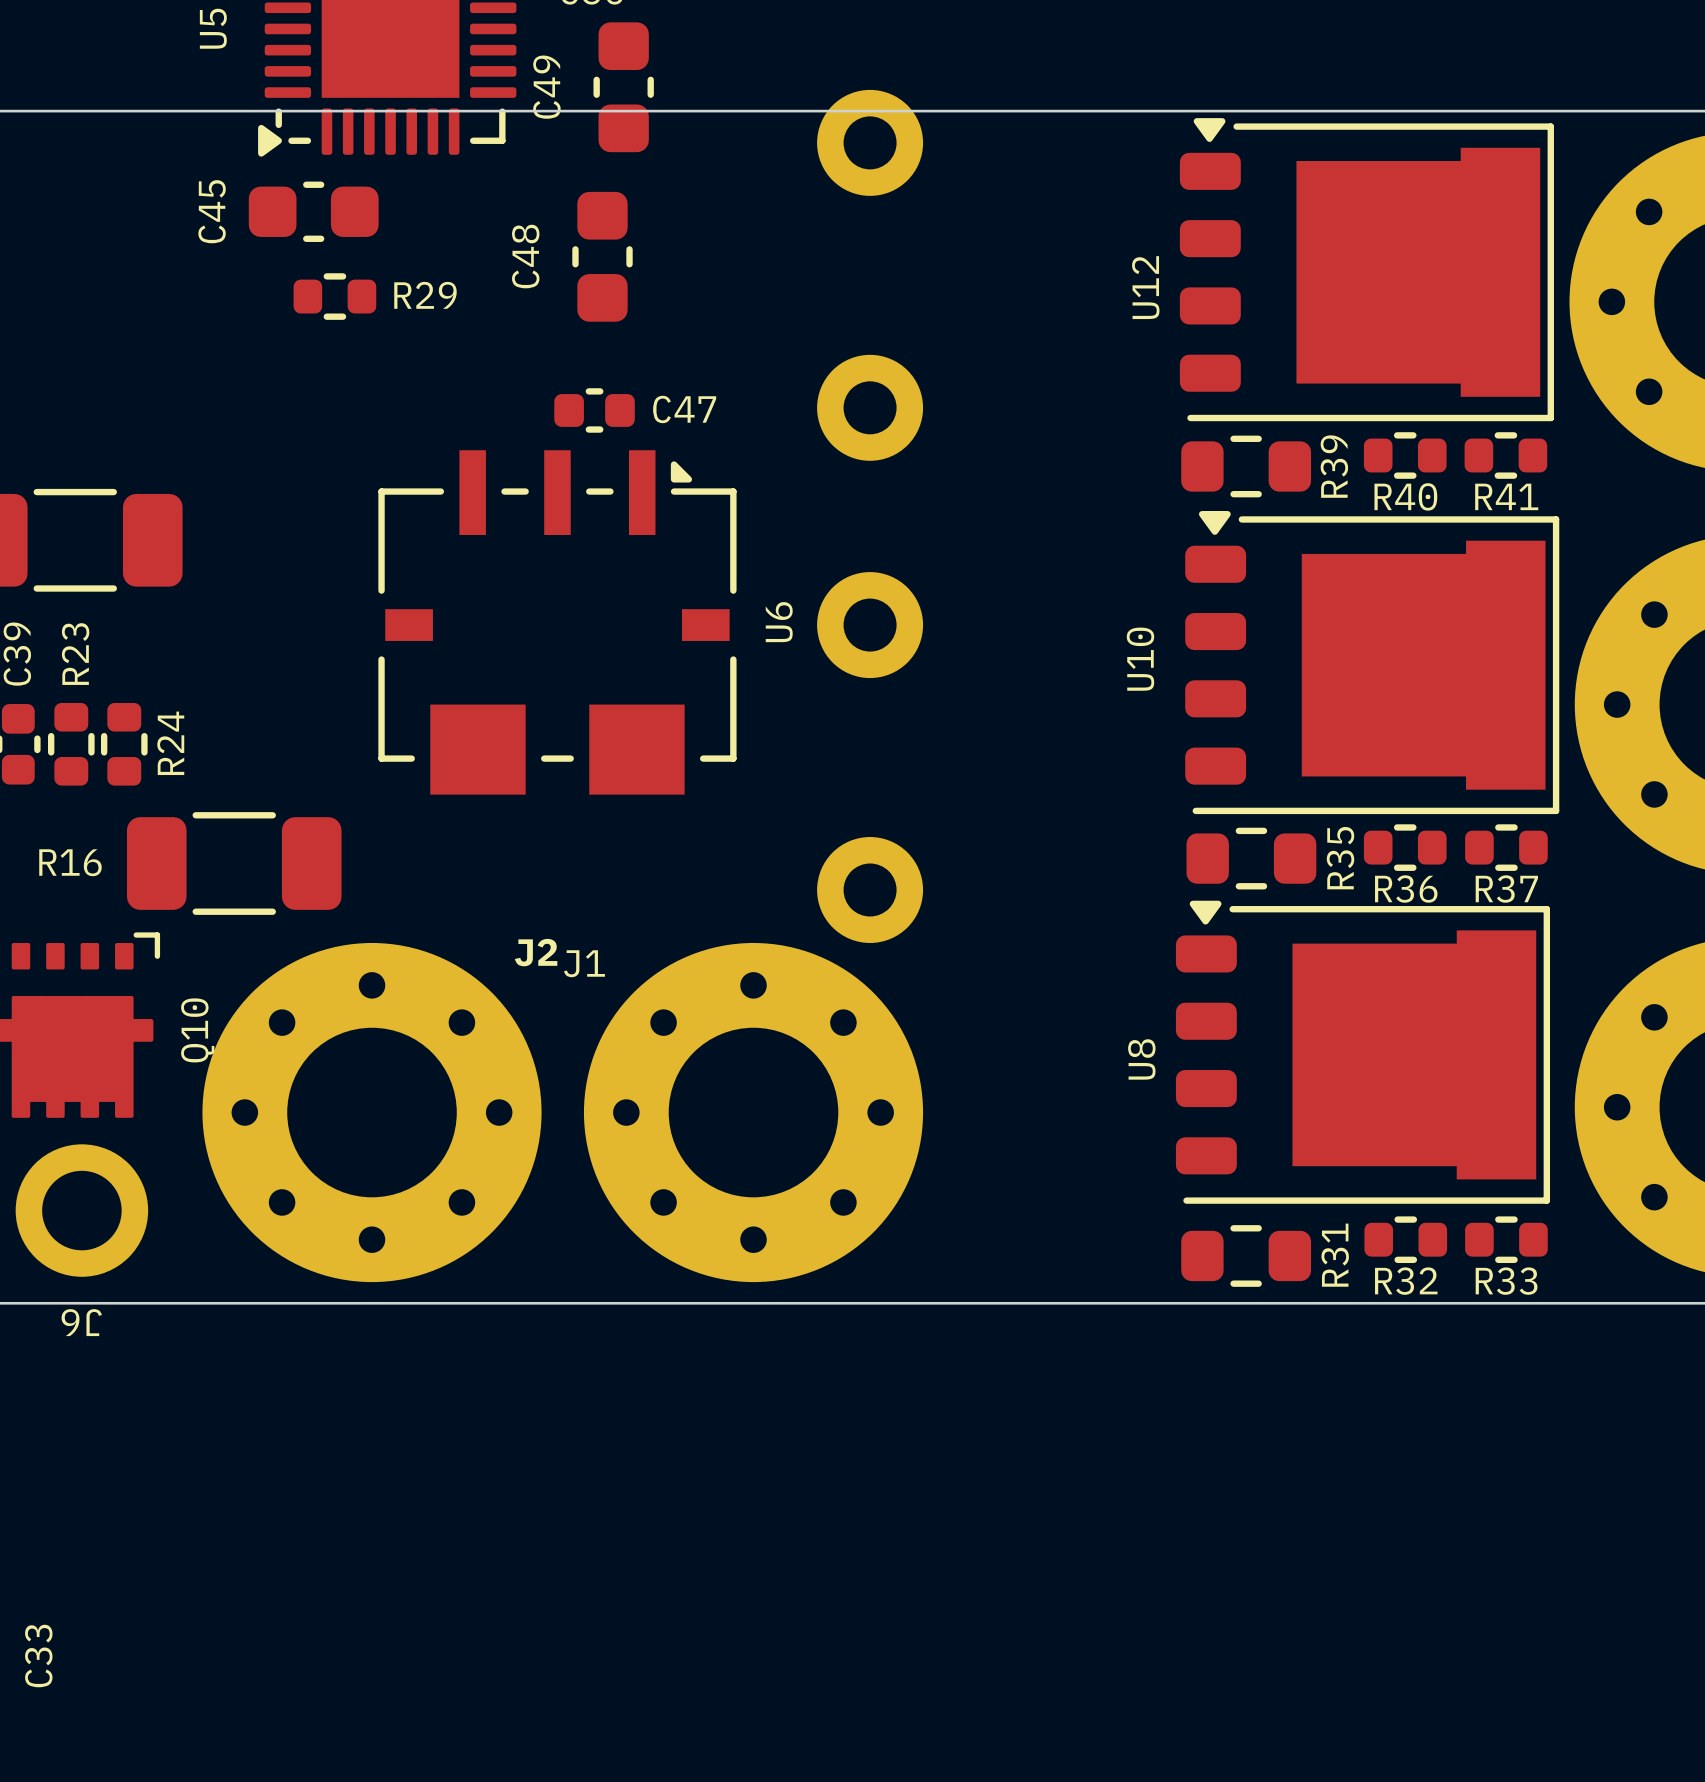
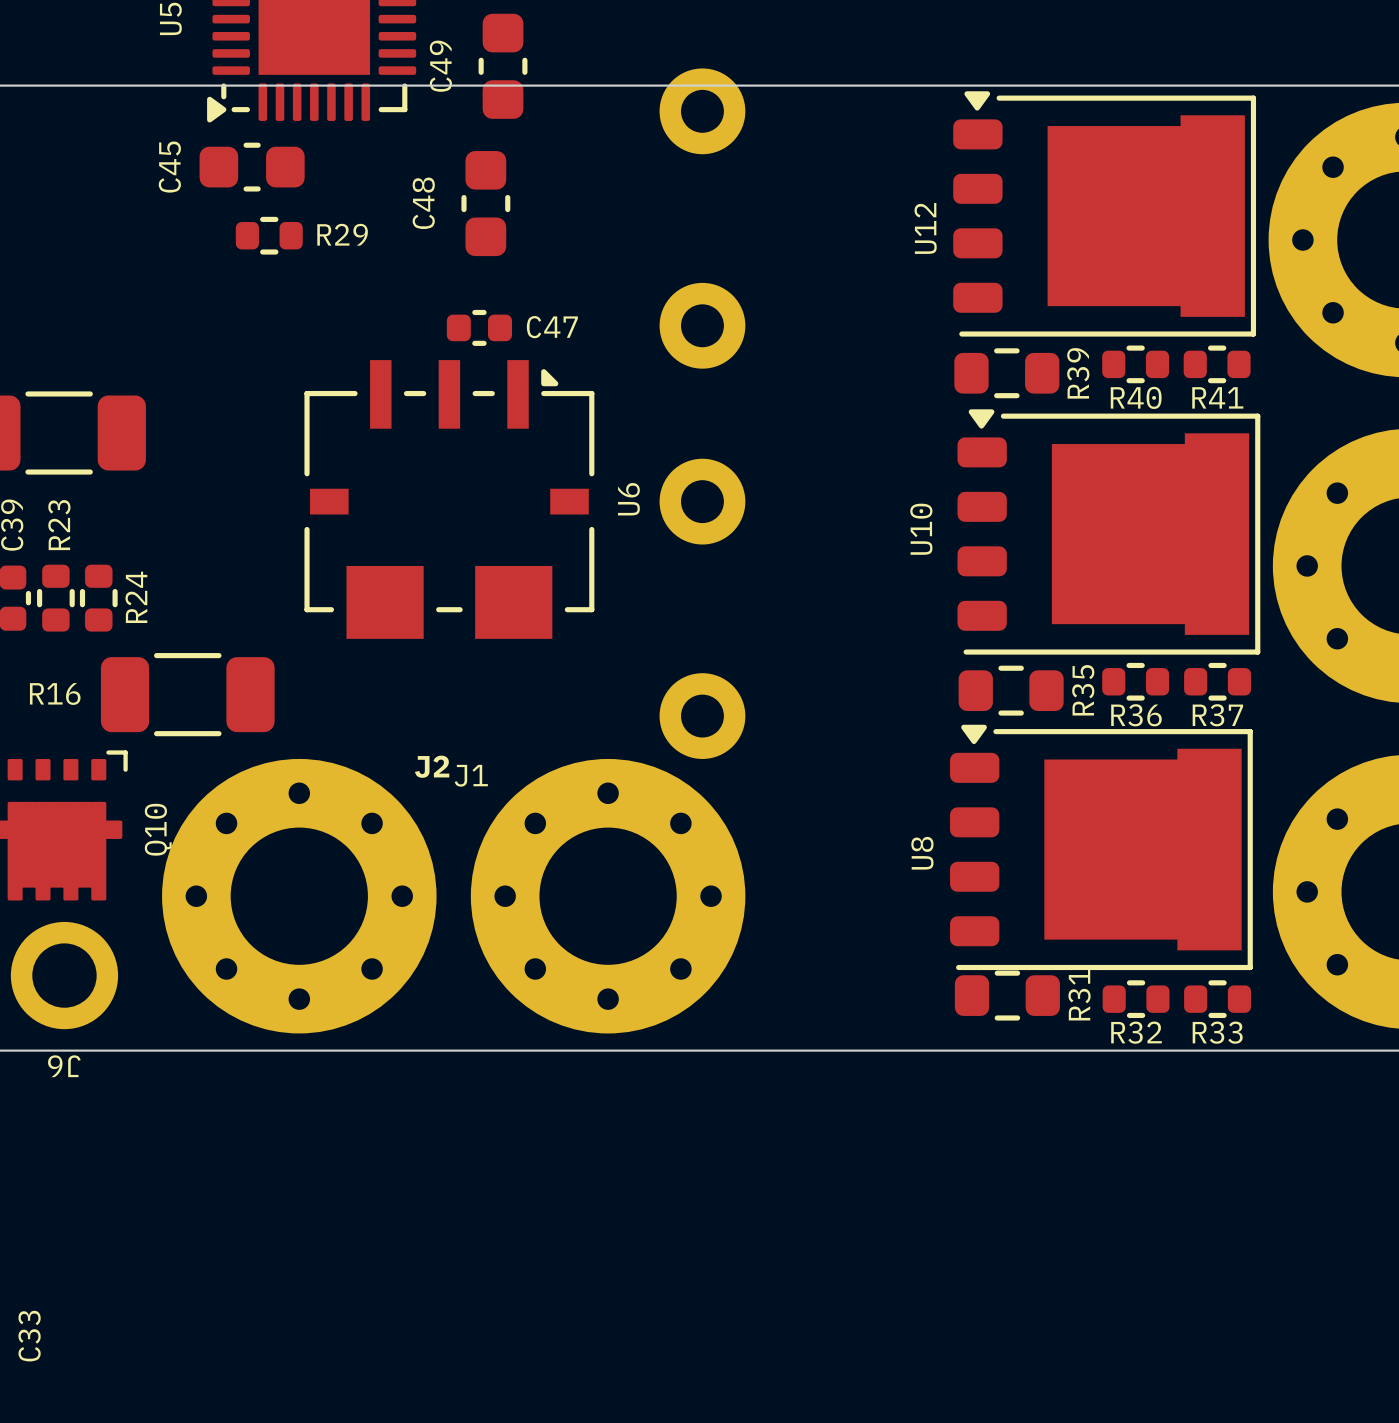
R31 position: (1246, 1255) -> (1007, 995)

